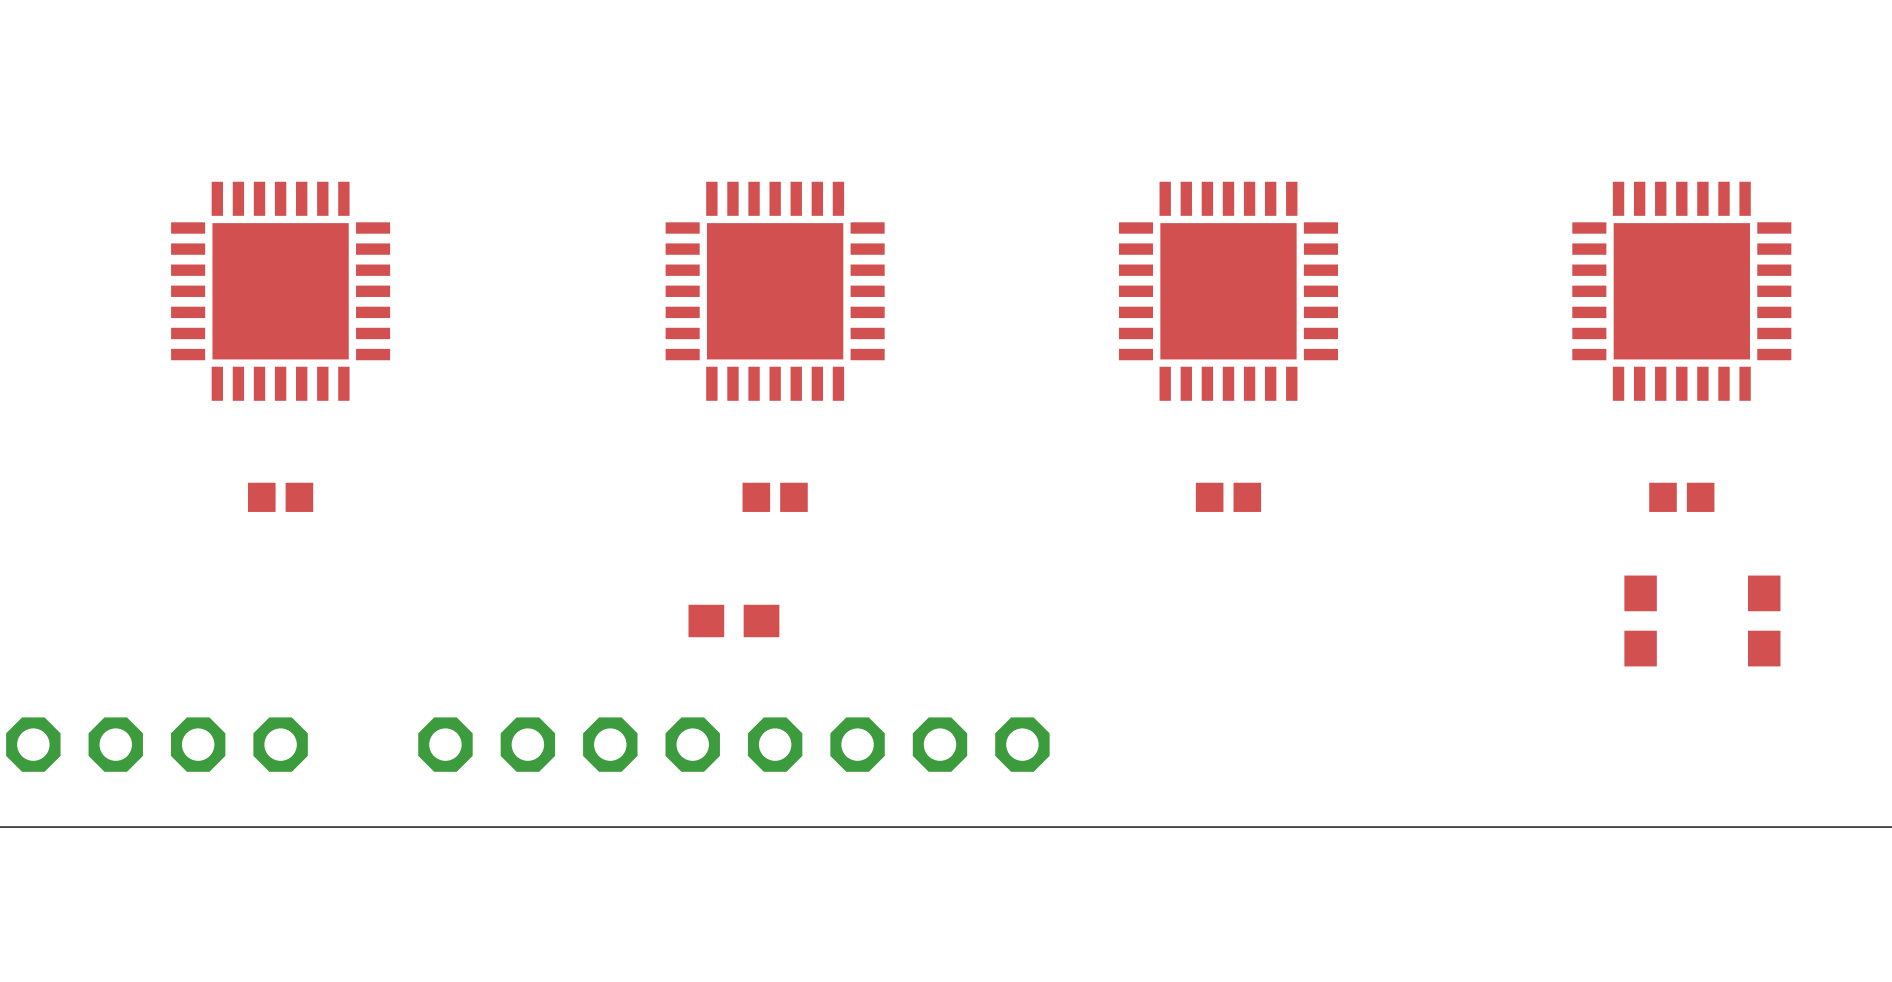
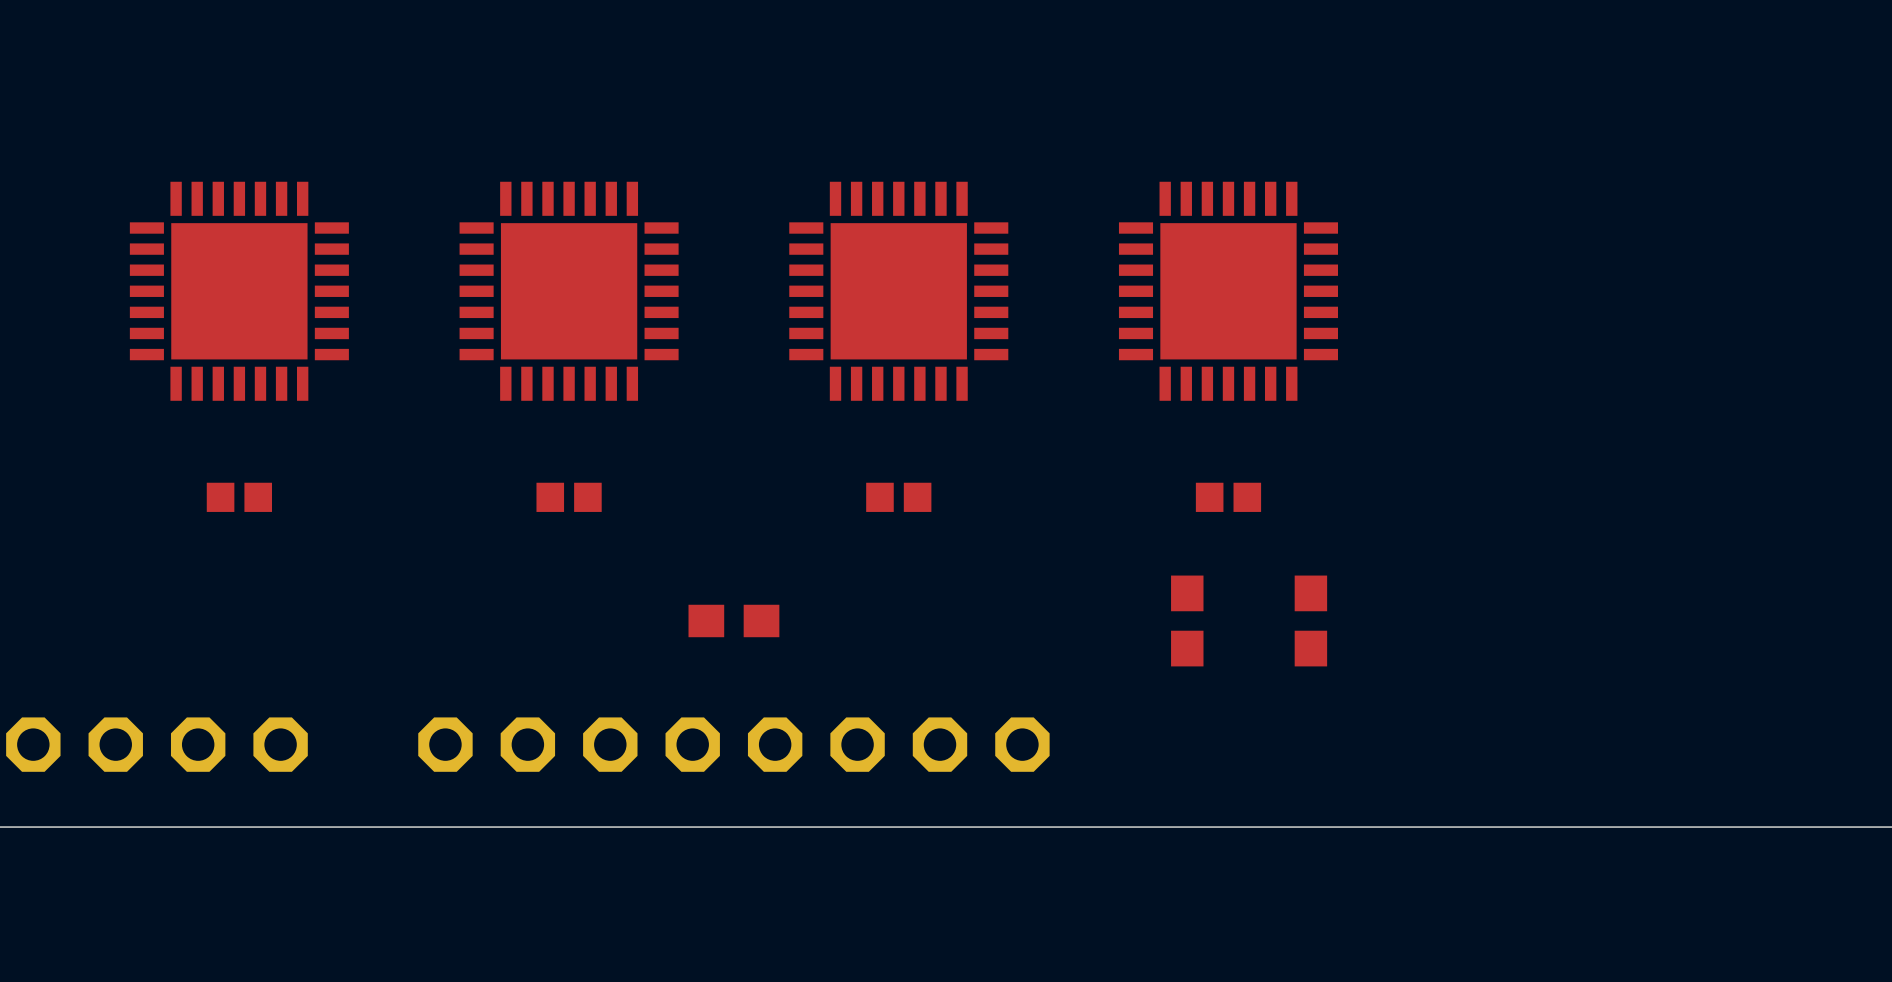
part position: (280, 291) -> (239, 291)
part: none -> (569, 291)
part: (775, 291) -> none
part: none -> (898, 291)
part: (1681, 291) -> none
part position: (280, 497) -> (239, 497)
part: none -> (569, 497)
part: (775, 497) -> none
part: none -> (898, 497)
part: (1681, 497) -> none
part: none -> (1187, 620)
part: none -> (1310, 620)
part: (1640, 620) -> none
part: (1764, 620) -> none

